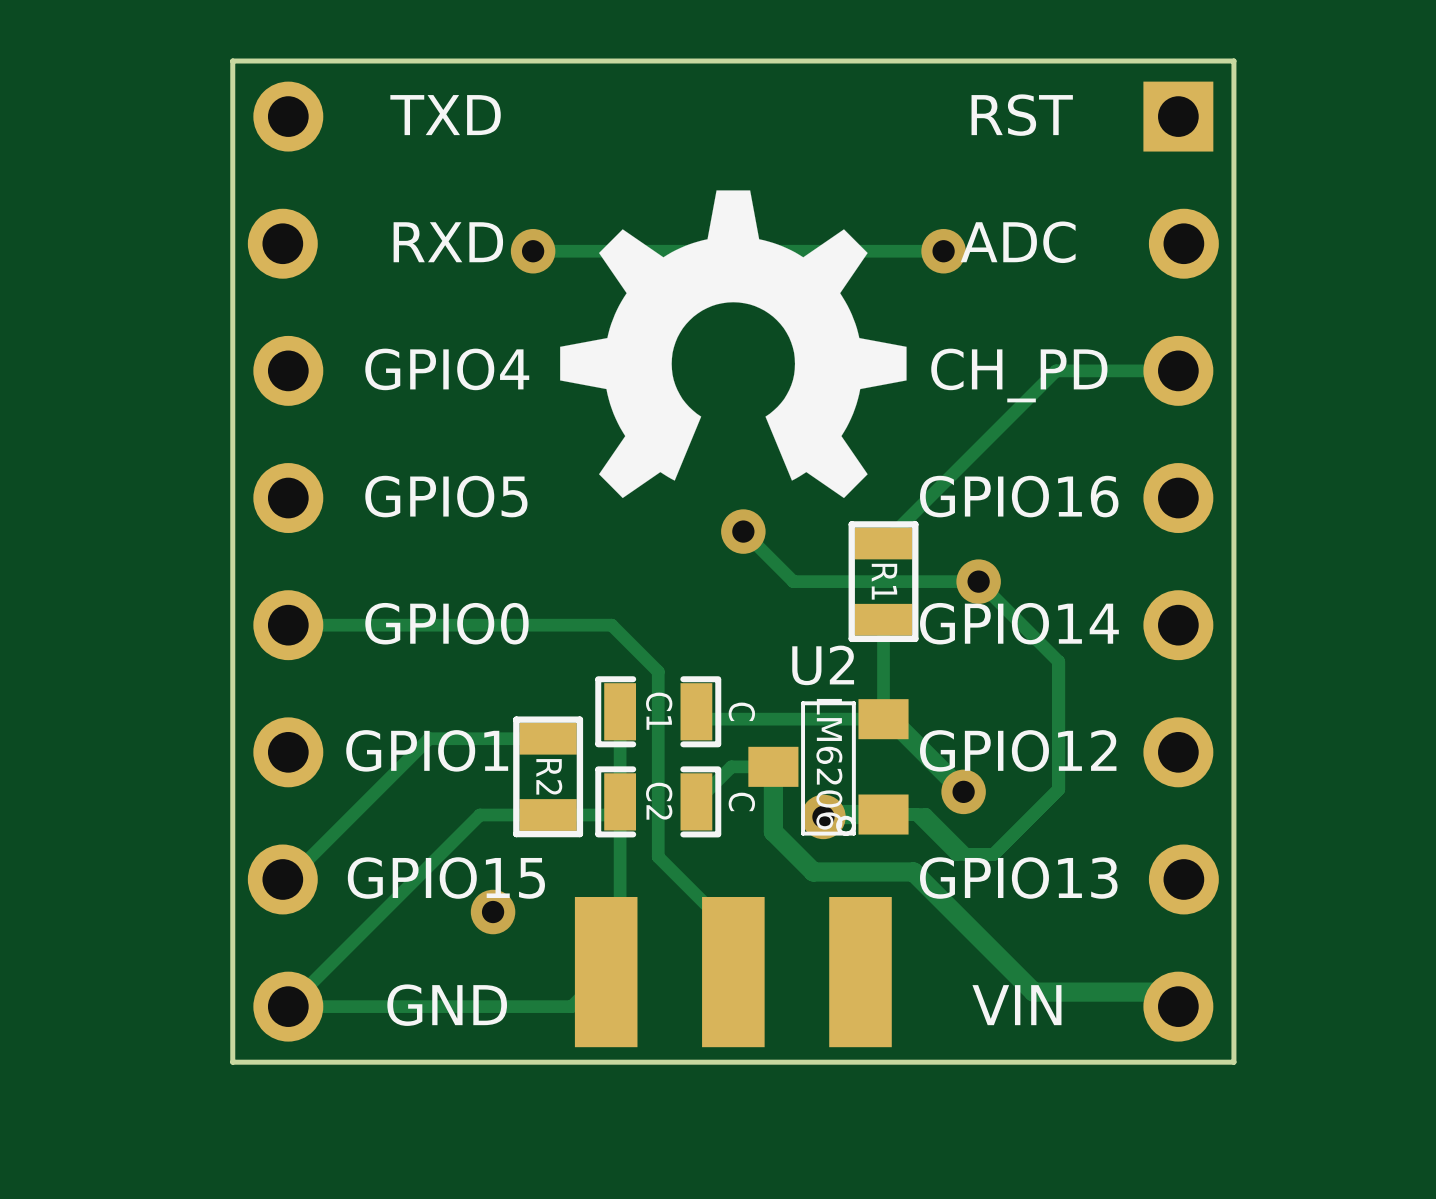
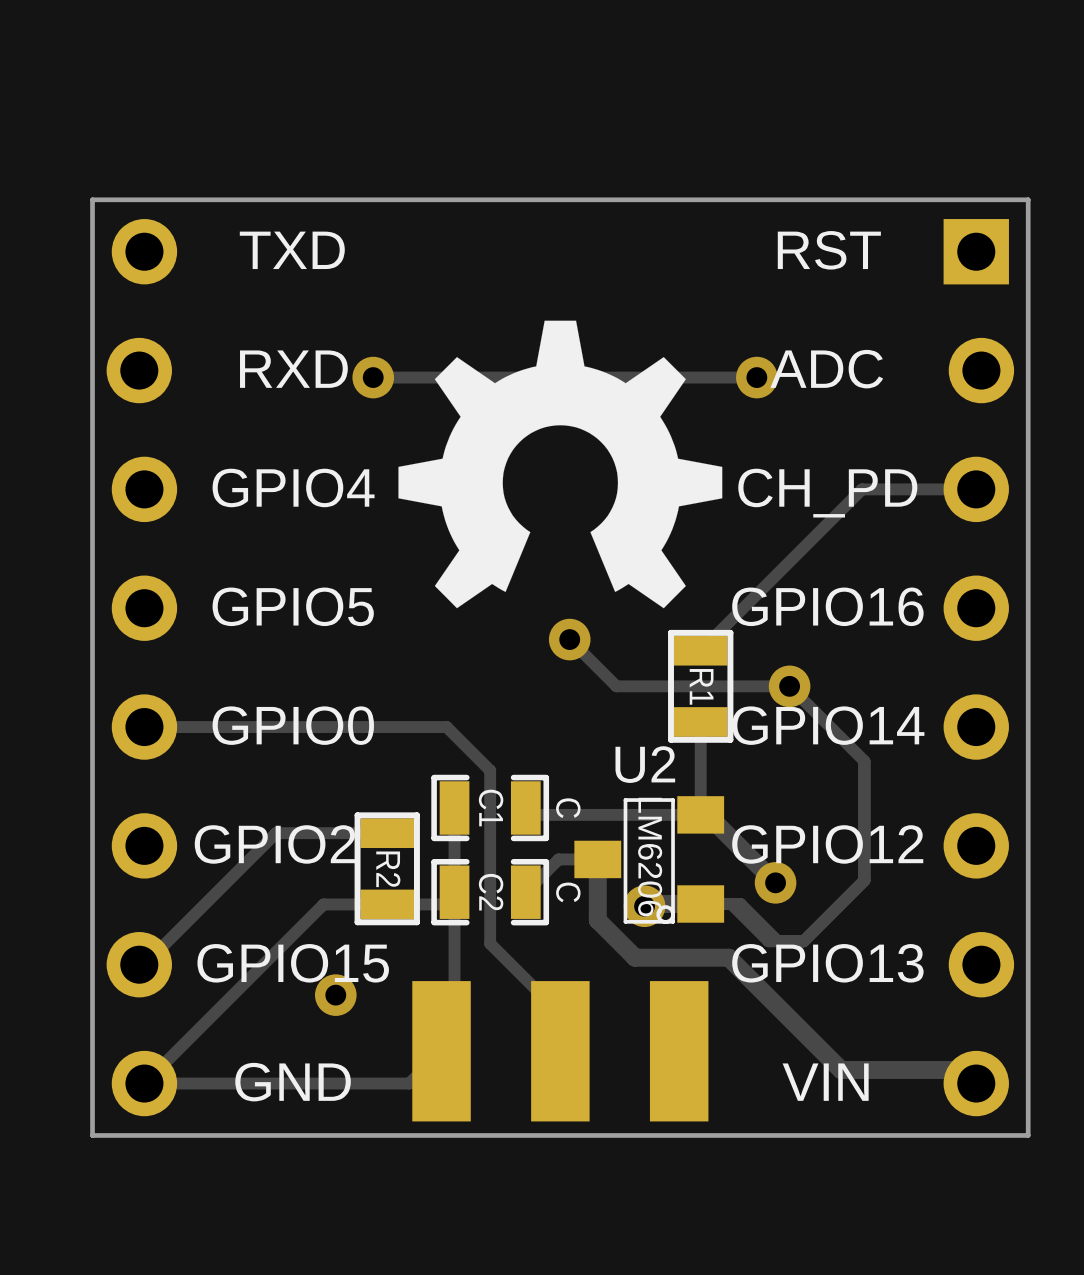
text: GPIO1 (427, 750) -> GPIO2 (275, 844)

